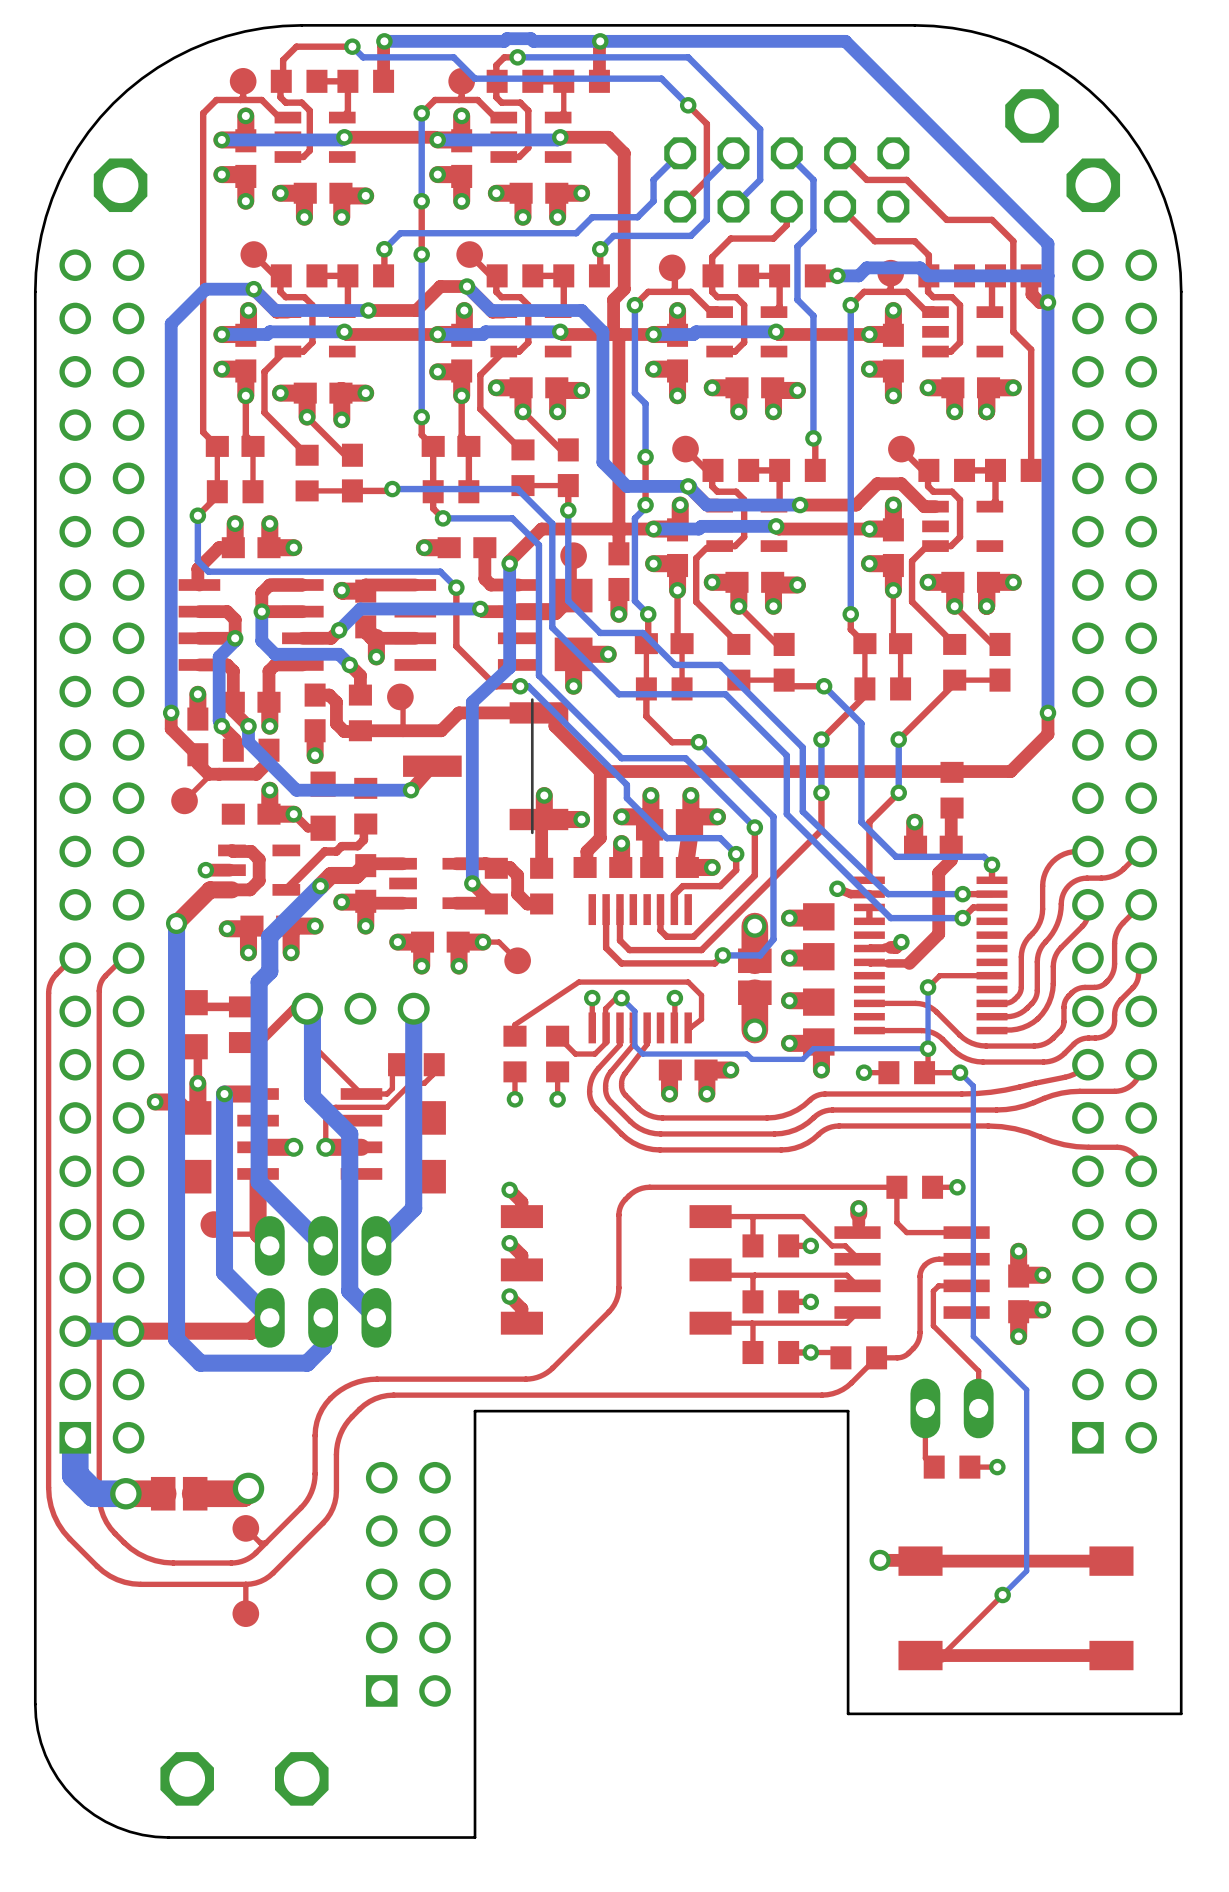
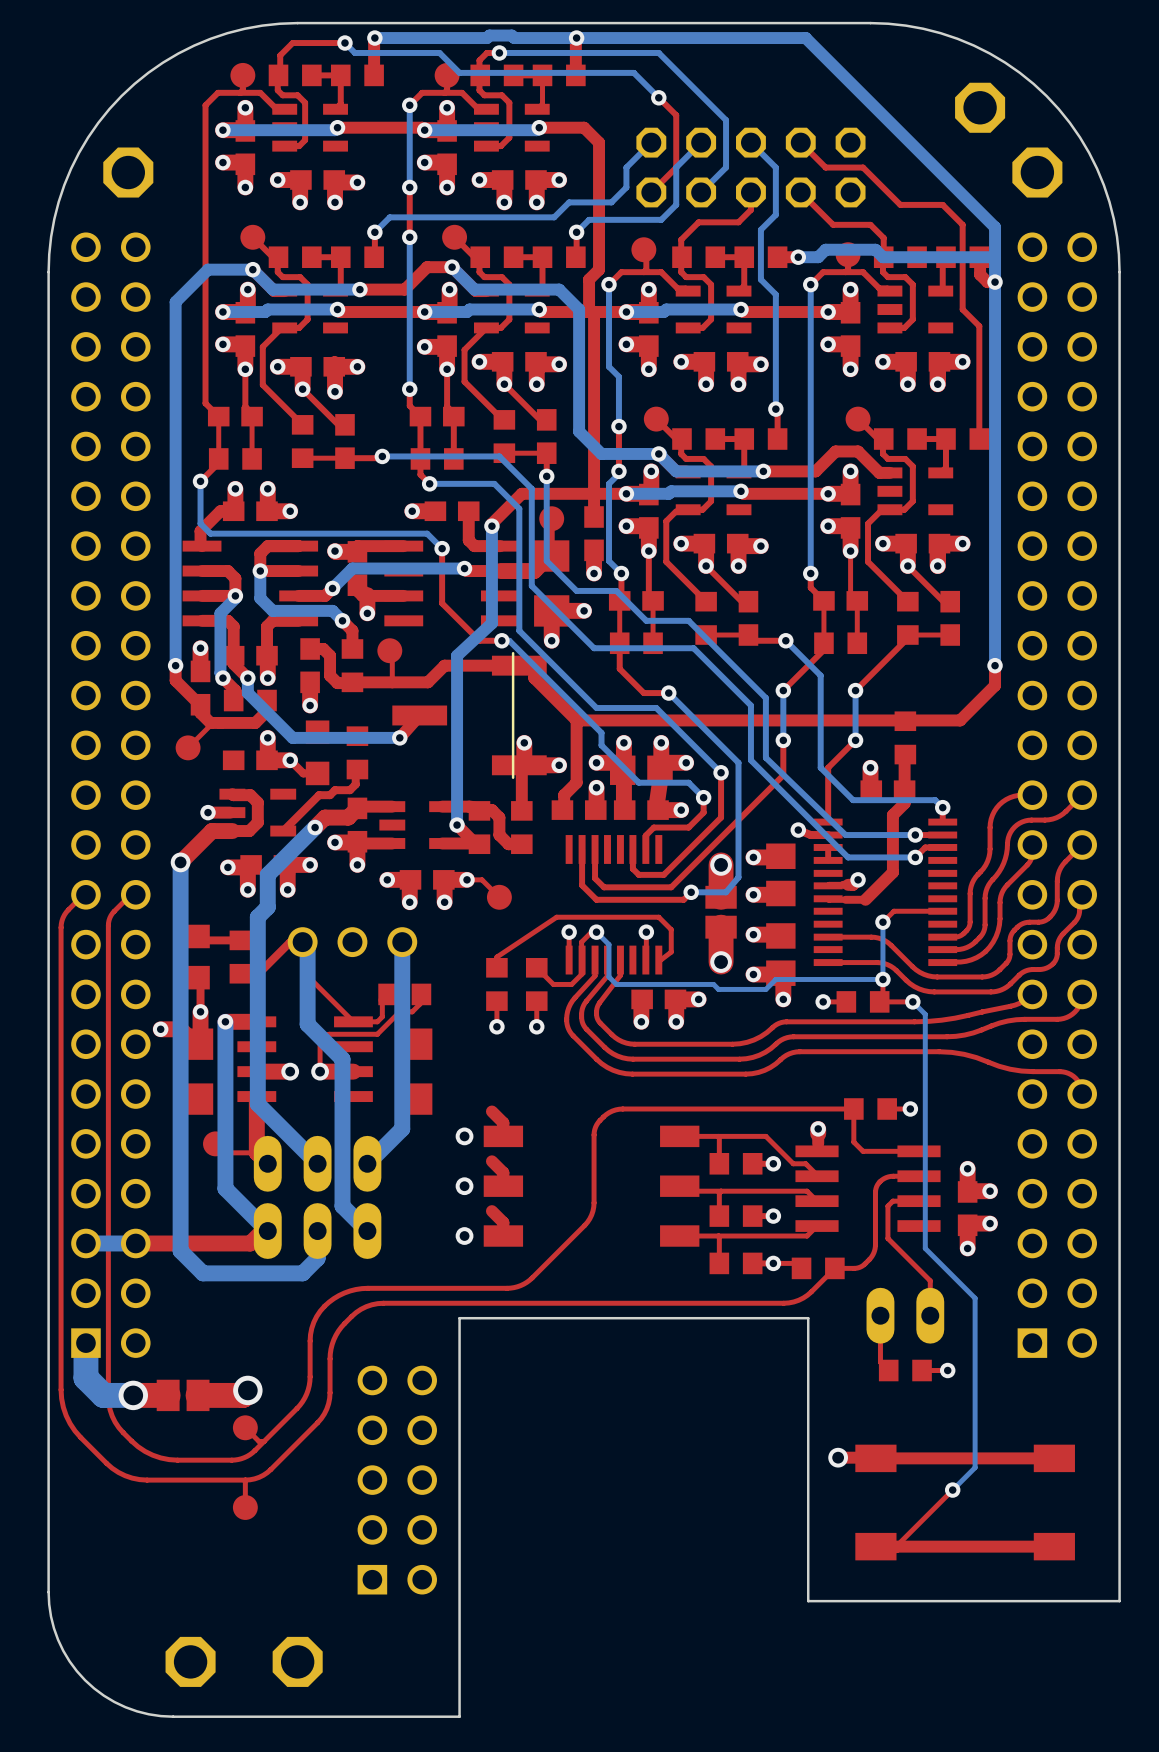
via: (509, 1189) -> none
via: none -> (464, 1136)
via: (509, 1243) -> none
via: none -> (464, 1186)
via: (509, 1296) -> none
via: none -> (464, 1236)

